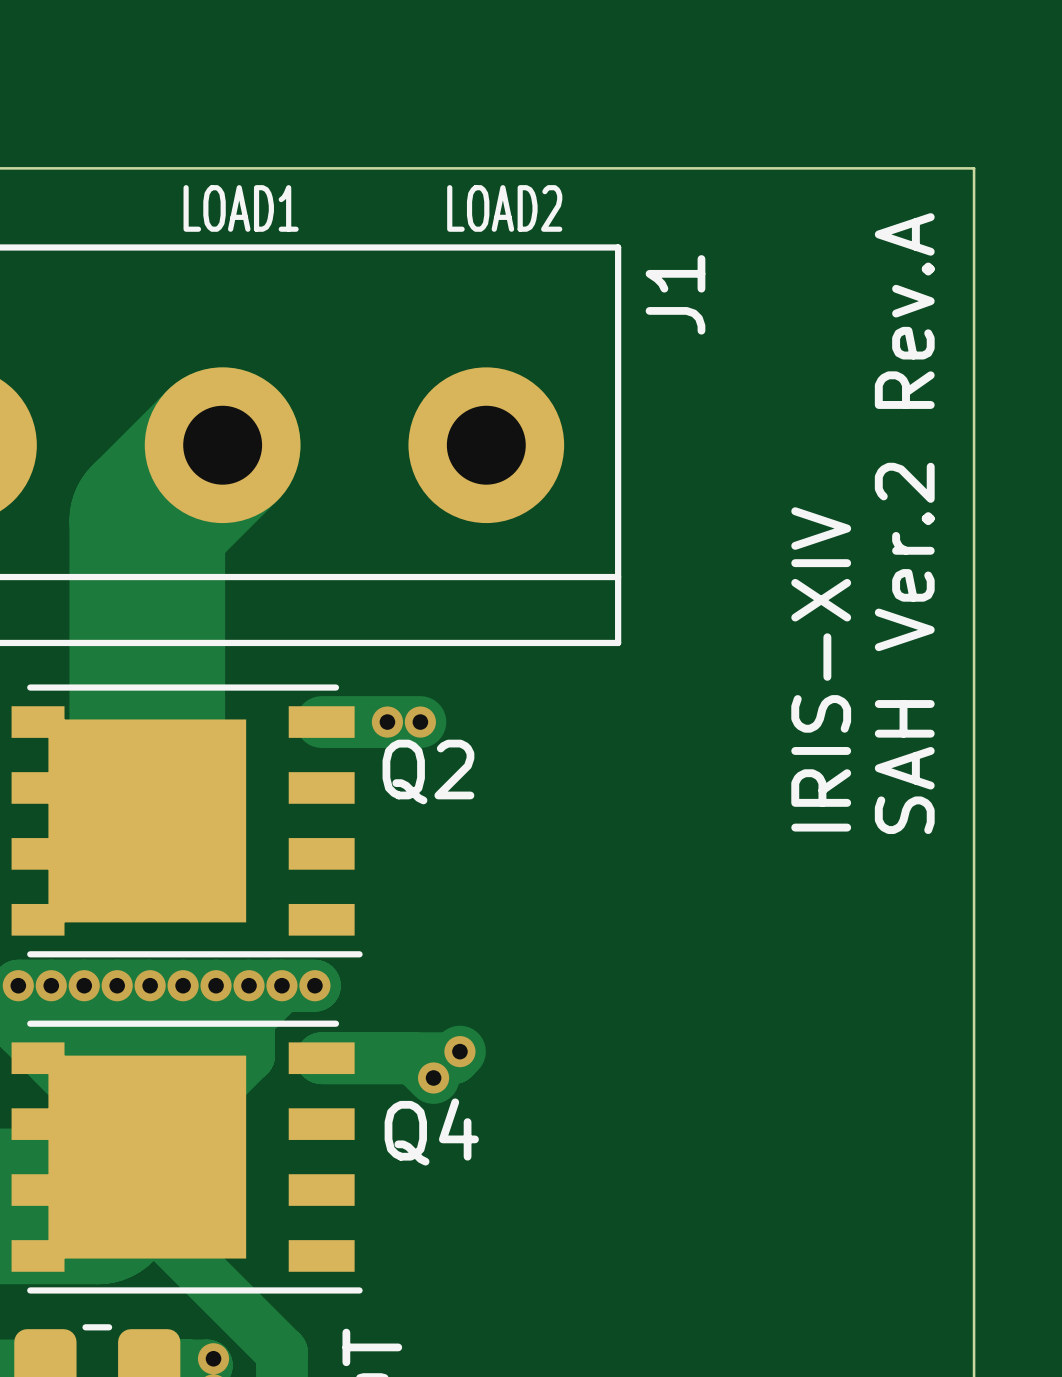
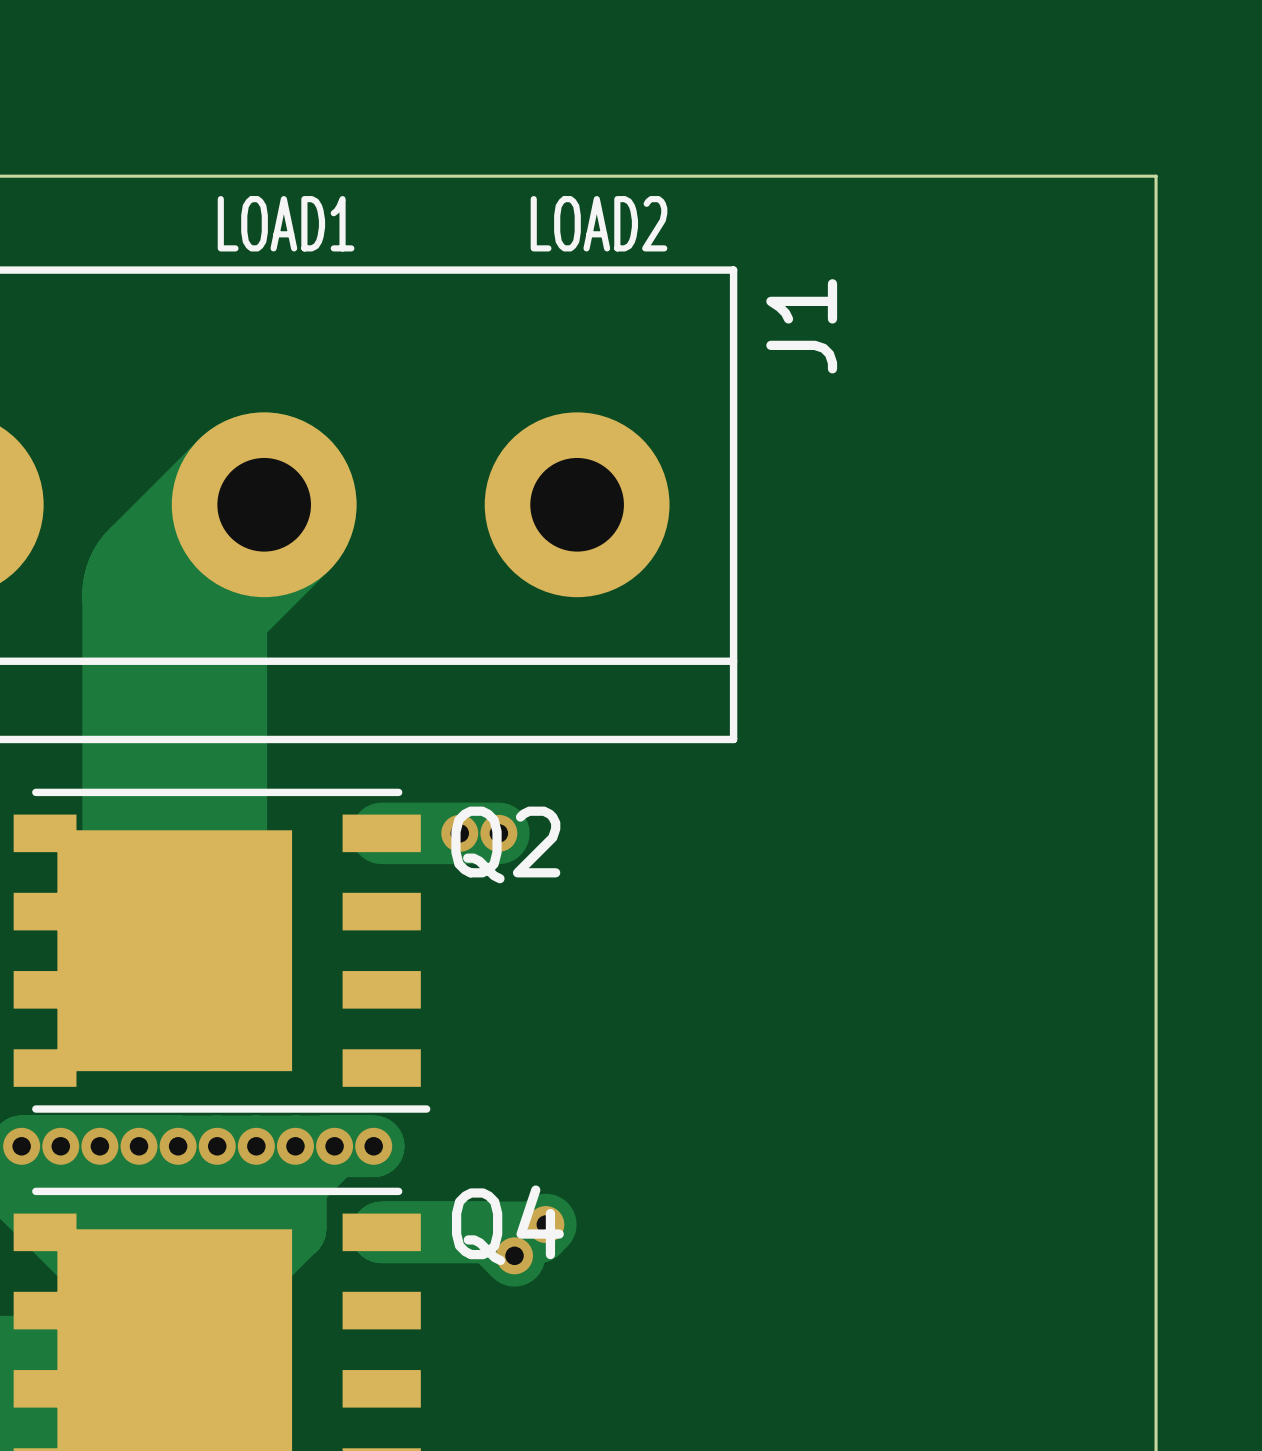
text: SAH Ver.2 Rev.A (904, 523) -> none
text: IRIS-XIV (821, 669) -> none
Q2 name position: Q2 (428, 771) -> Q2 (505, 844)
Q4 name position: Q4 (431, 1131) -> Q4 (507, 1225)

